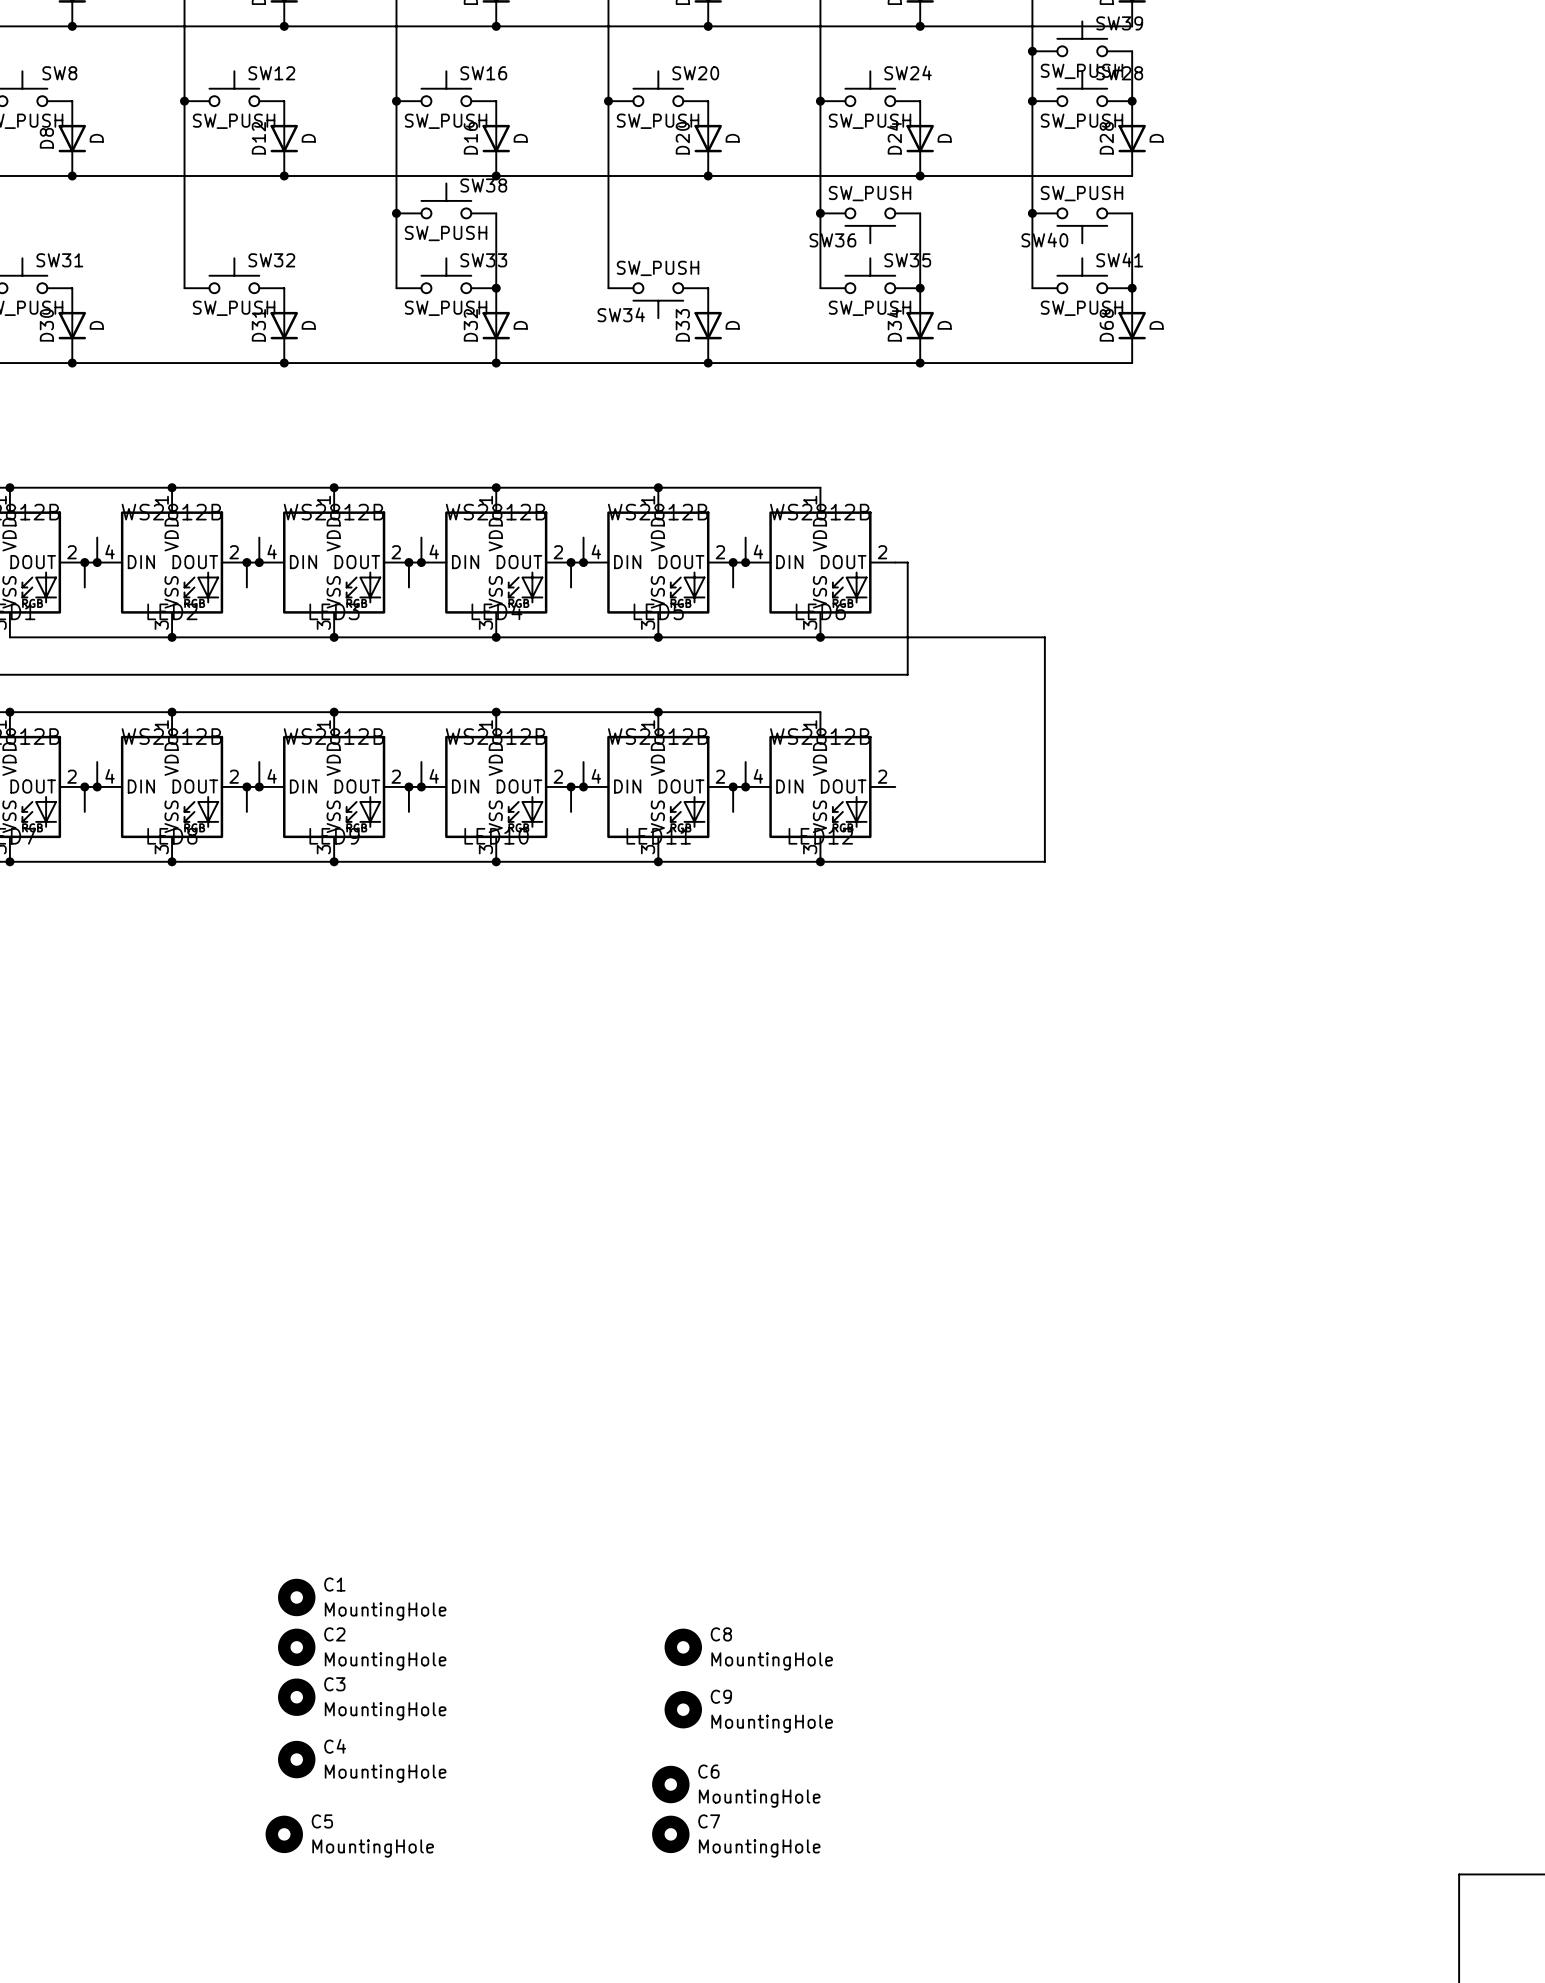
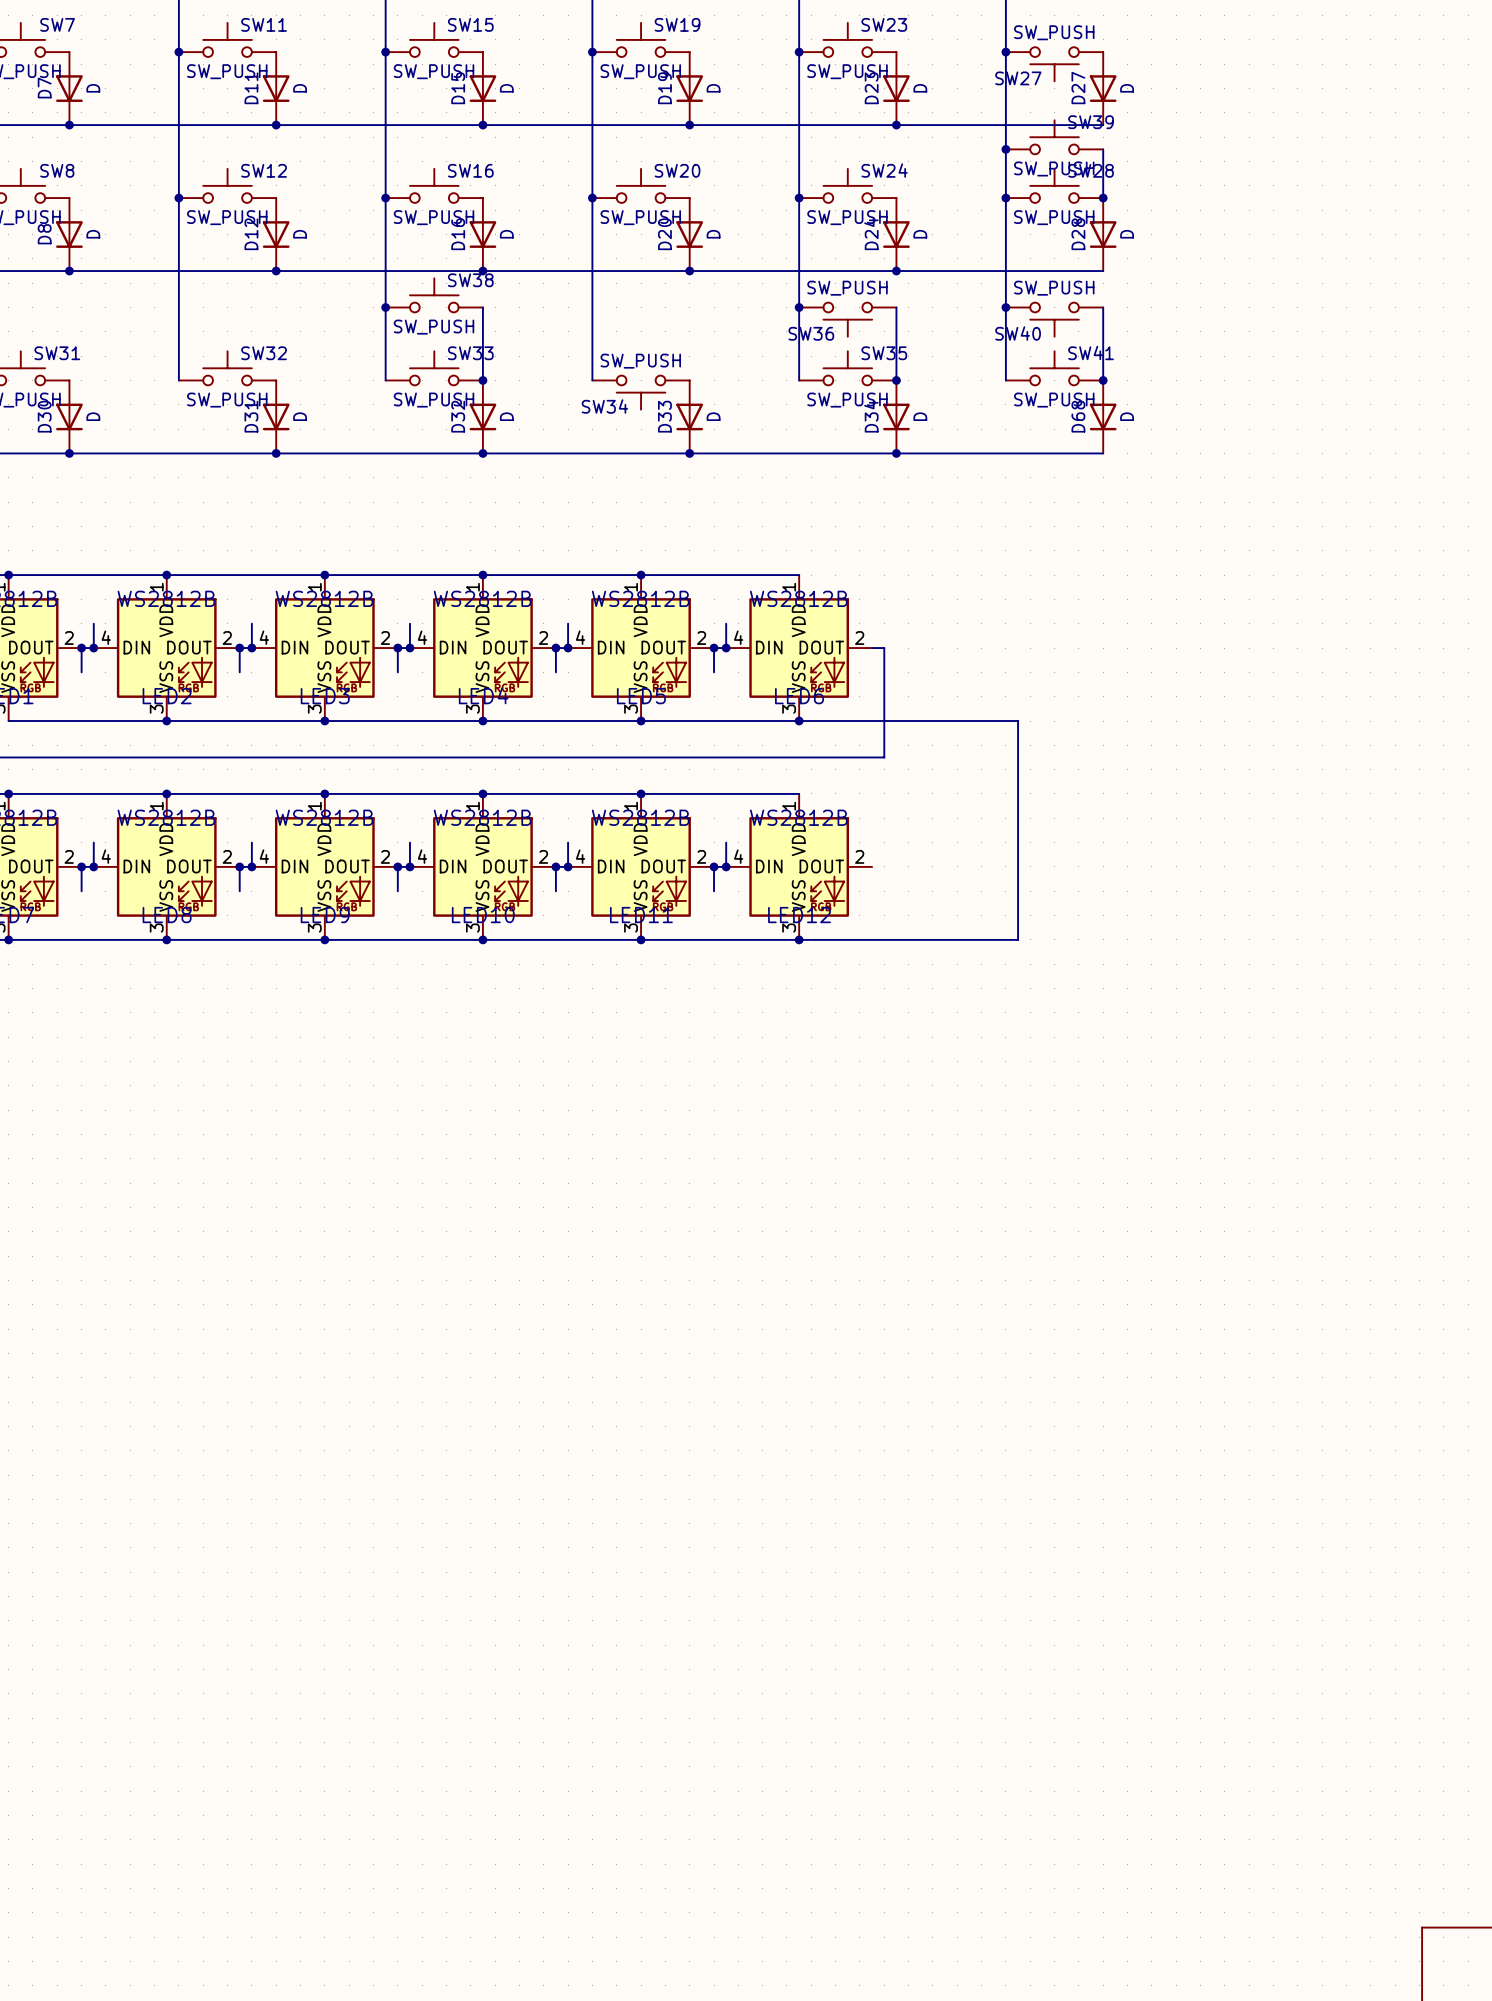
C1: MountingHole (296, 1597) -> none
C2: MountingHole (296, 1647) -> none
C8: MountingHole (683, 1647) -> none
C3: MountingHole (296, 1697) -> none
C9: MountingHole (683, 1709) -> none
C4: MountingHole (296, 1759) -> none
C6: MountingHole (670, 1784) -> none
C5: MountingHole (284, 1834) -> none
C7: MountingHole (670, 1834) -> none

